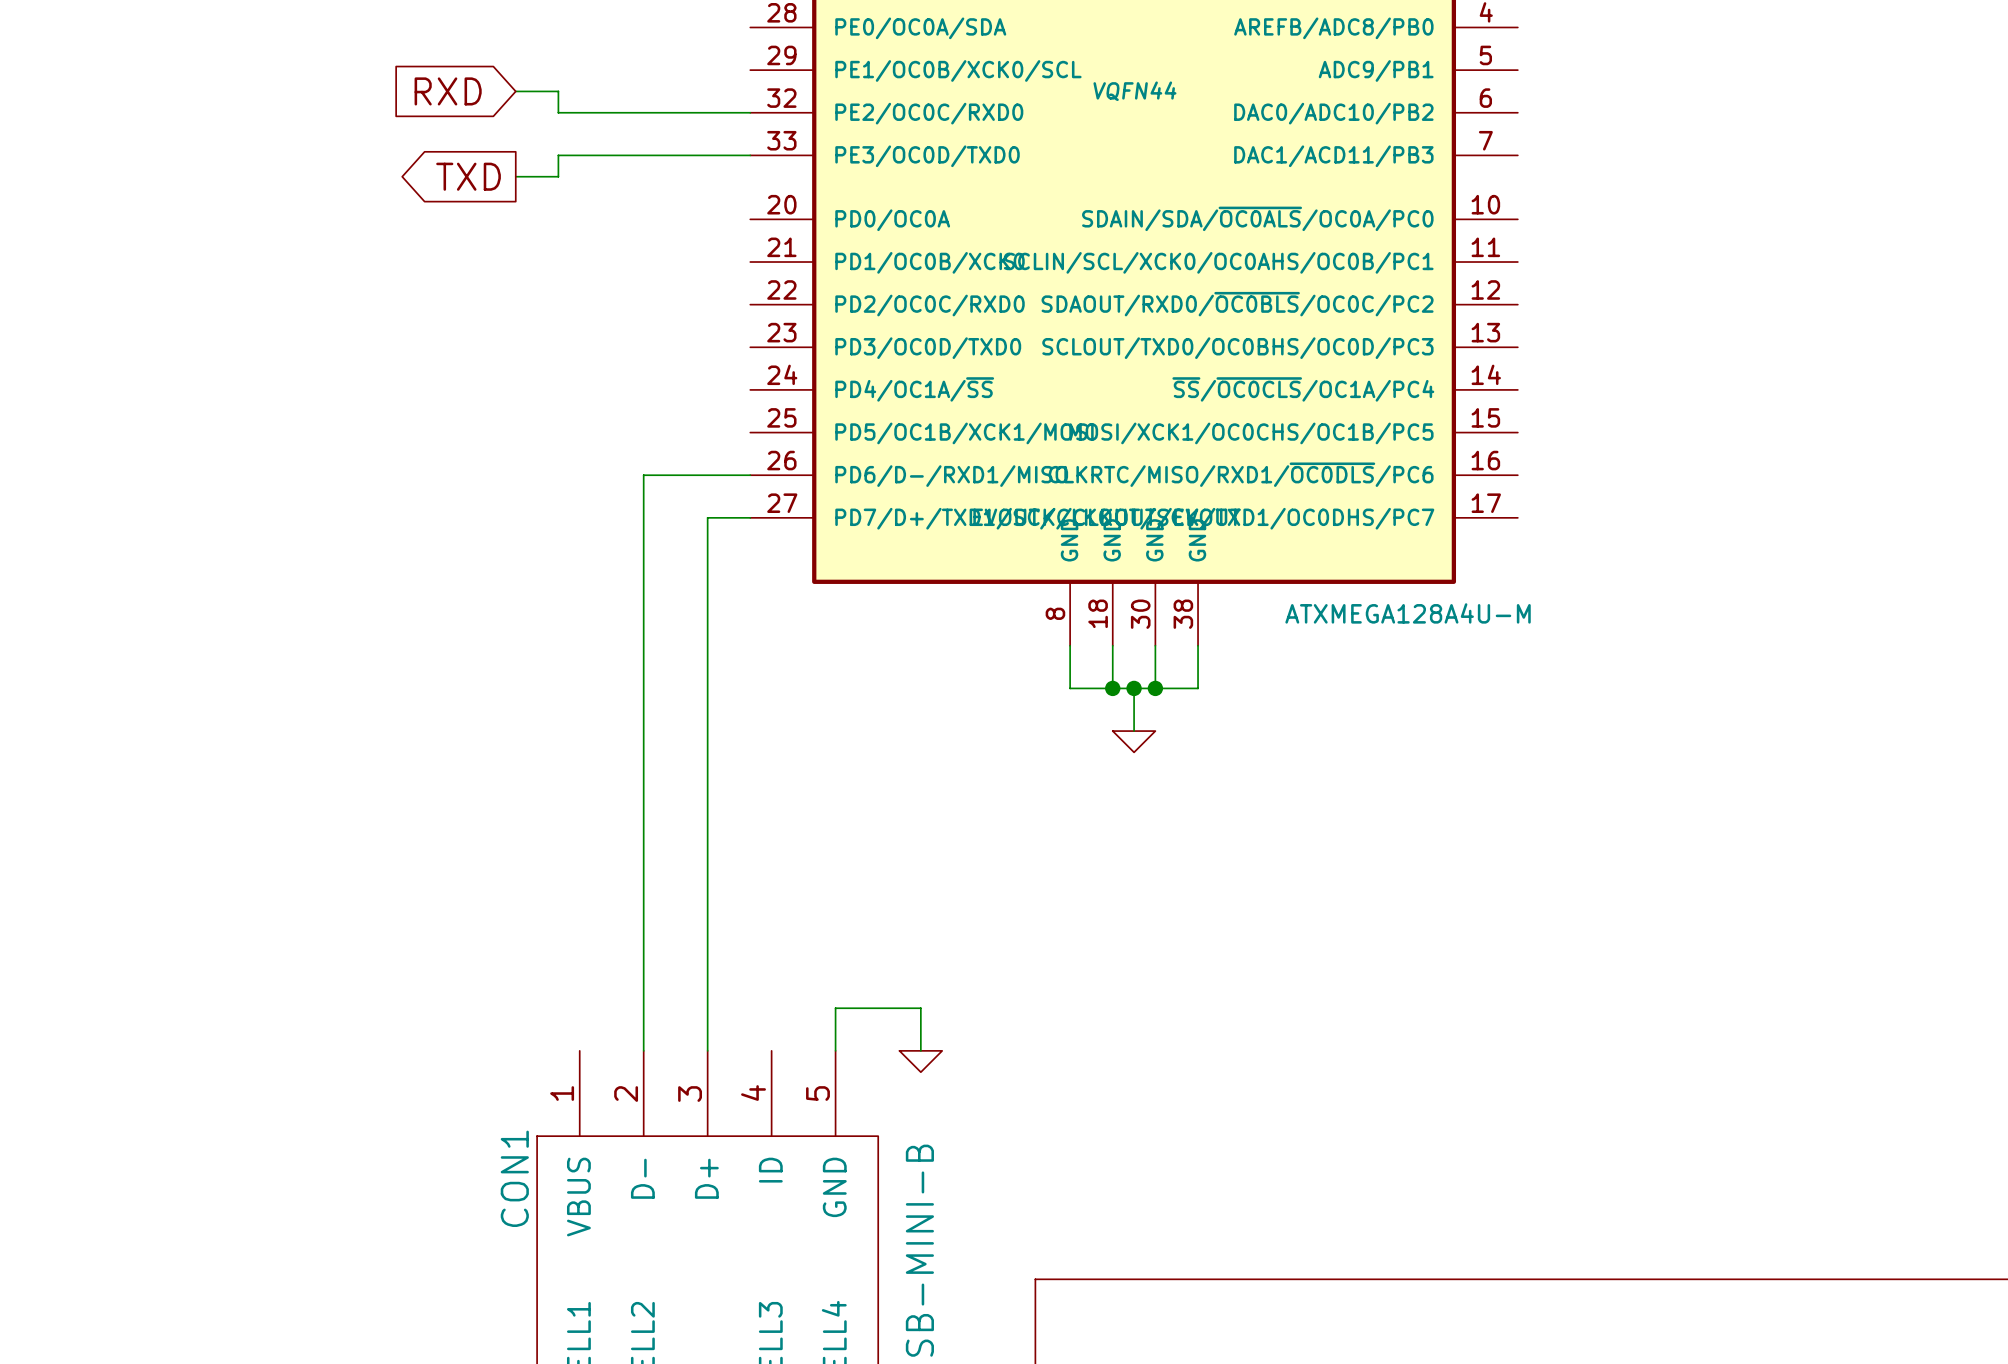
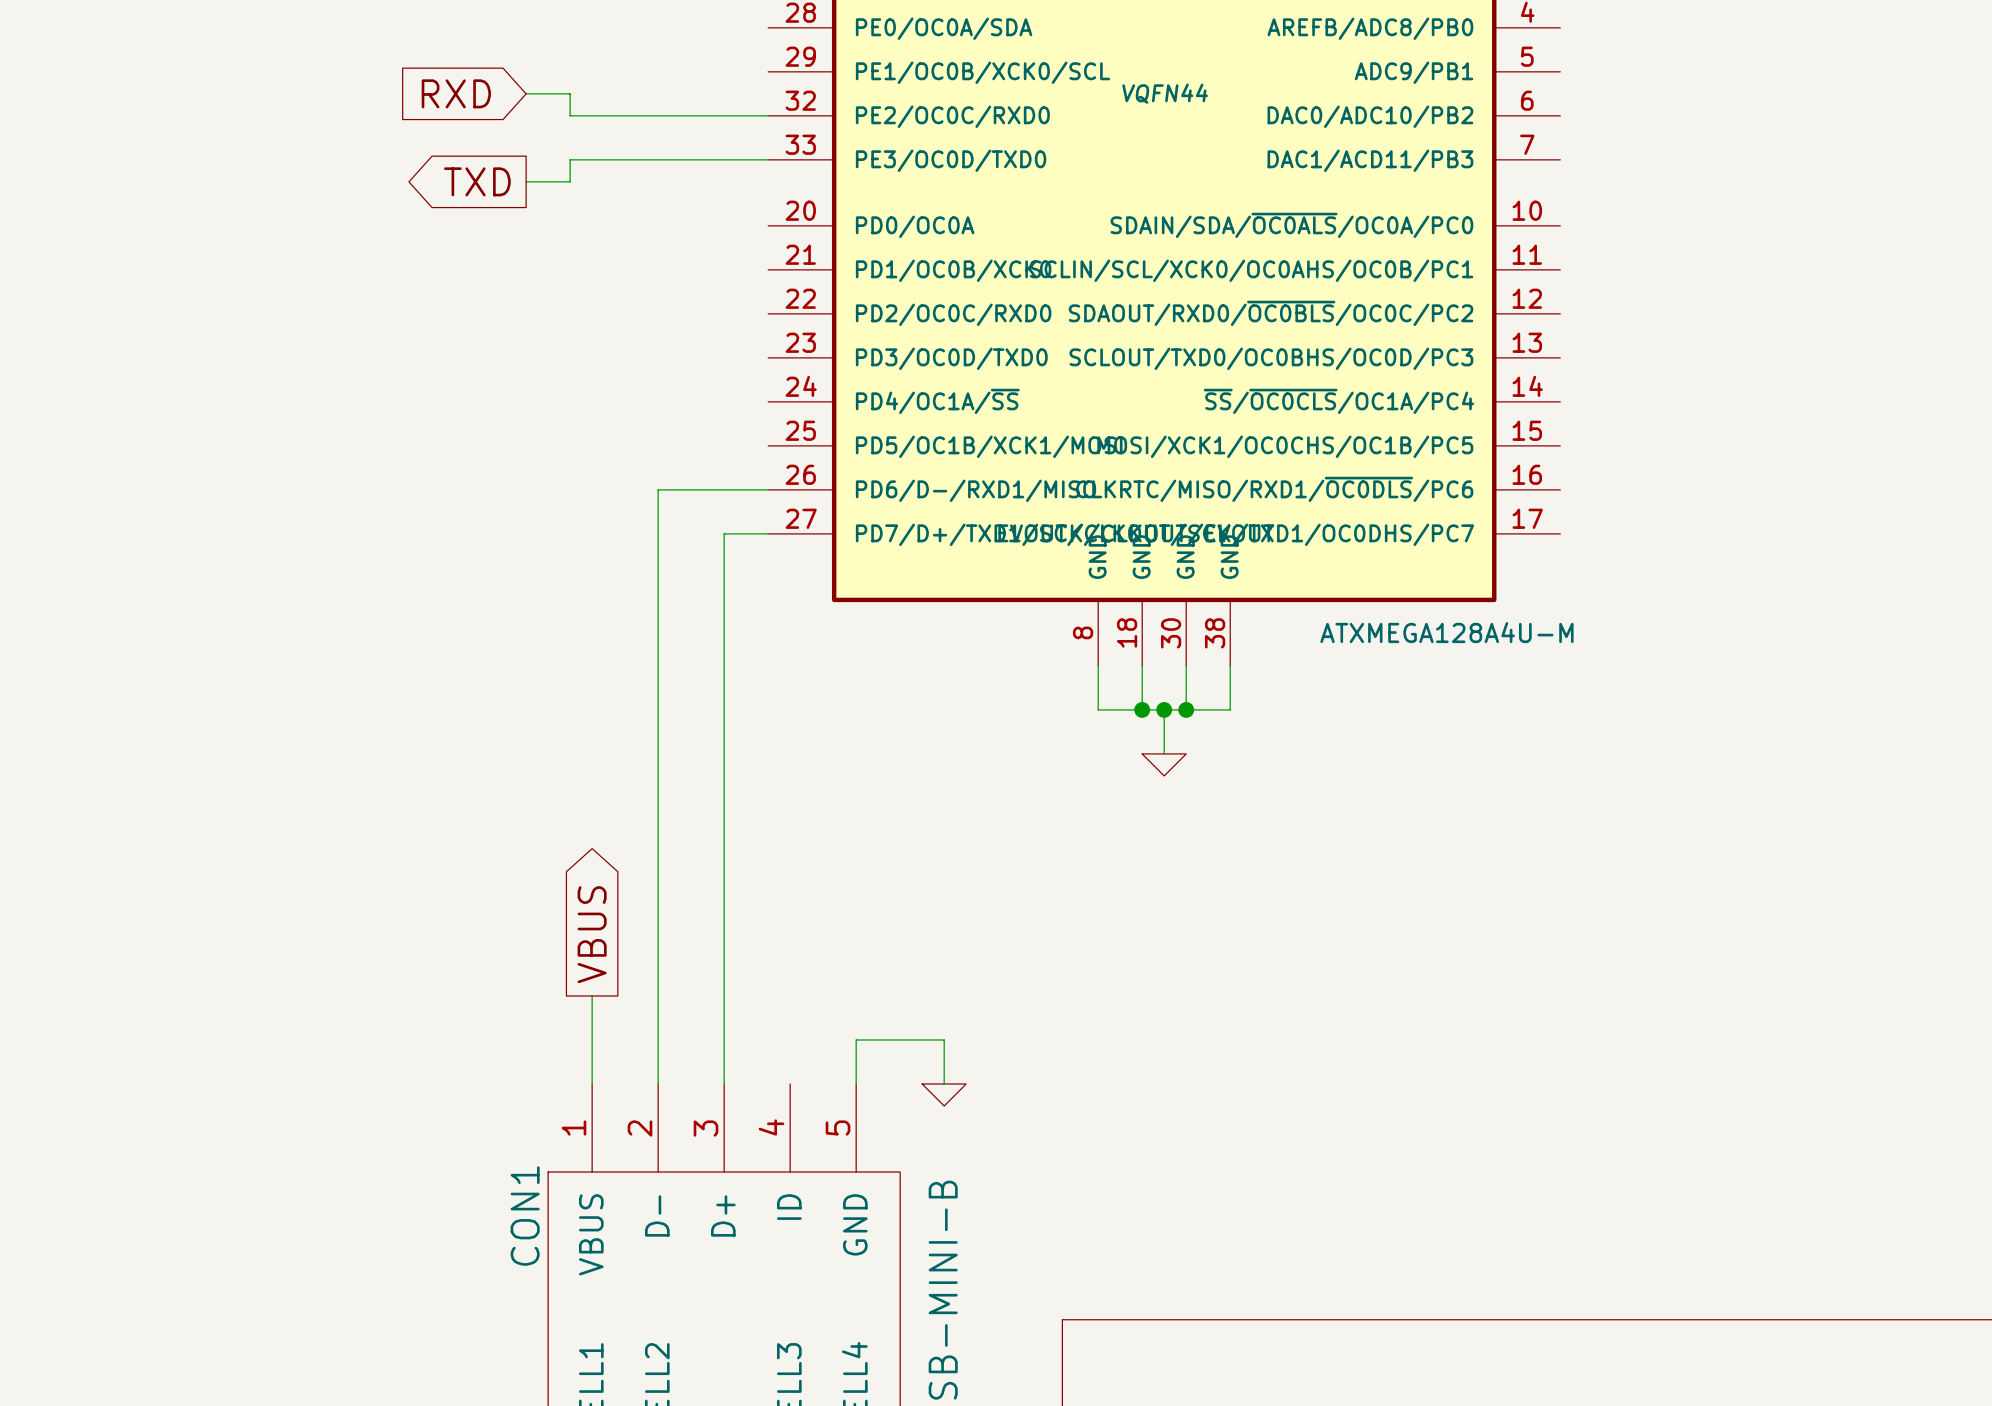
global label: none -> VBUS (592, 934)
wire: none -> (592, 995) (592, 1083)

